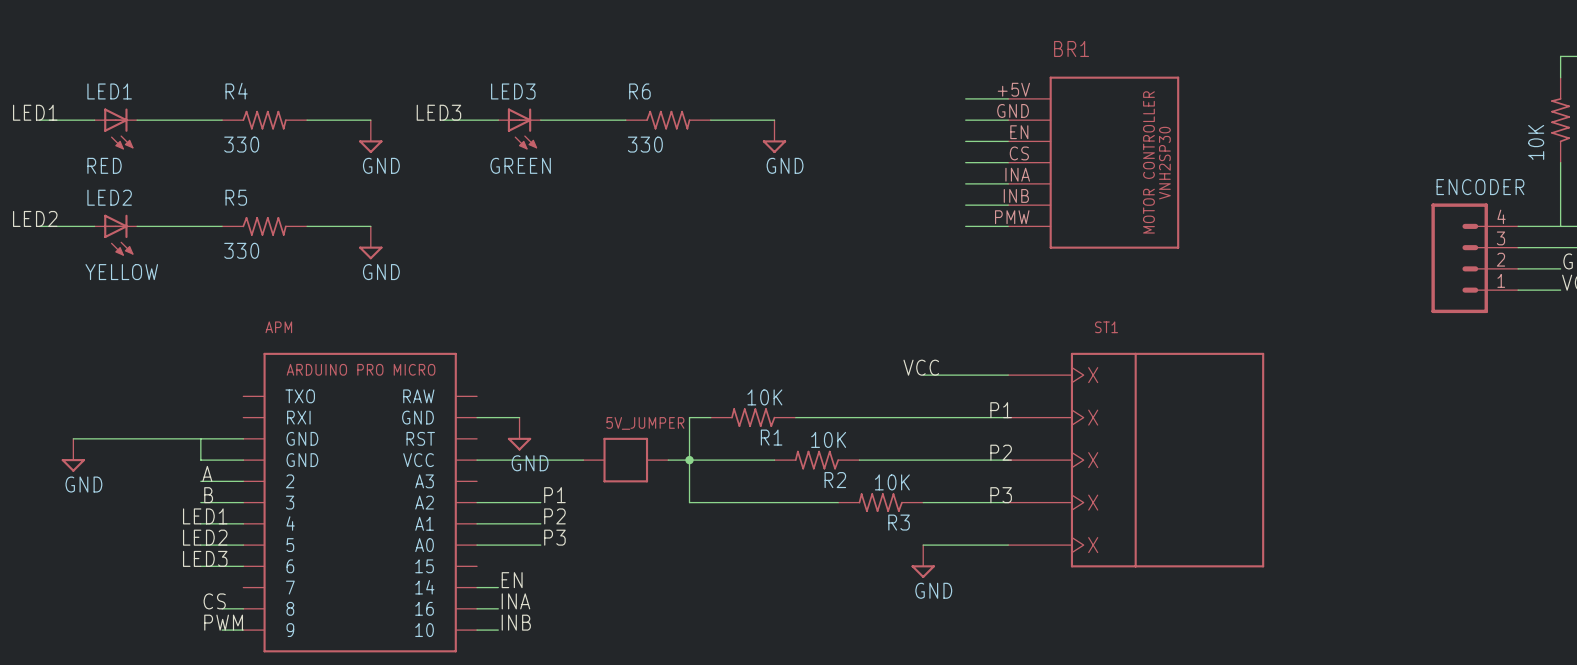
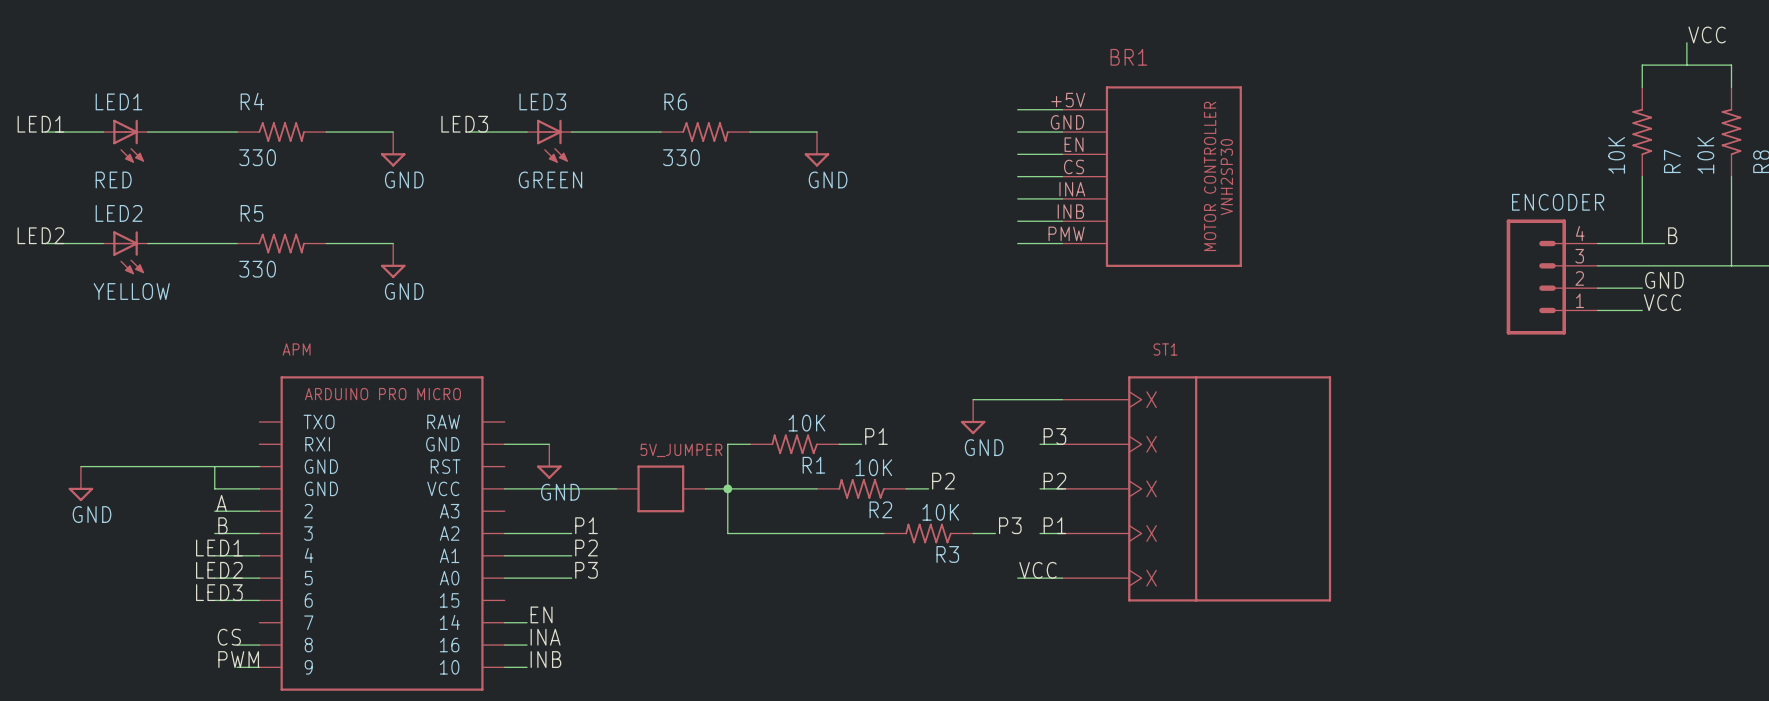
label position: VCC (921, 367) -> VCC (1037, 570)
label: none -> P1 (876, 436)
label: P1 (1001, 410) -> P3 (1054, 436)
wire: (816, 417) (986, 417) -> none
label: none -> P2 (943, 481)
wire: (880, 460) (986, 460) -> none
label: none -> P3 (1010, 525)
label: P3 (1001, 495) -> P1 (1054, 525)
wire: (944, 502) (986, 502) -> none
wire: (923, 545) (965, 545) -> none
power symbol position: GND (923, 561) -> GND (973, 416)

